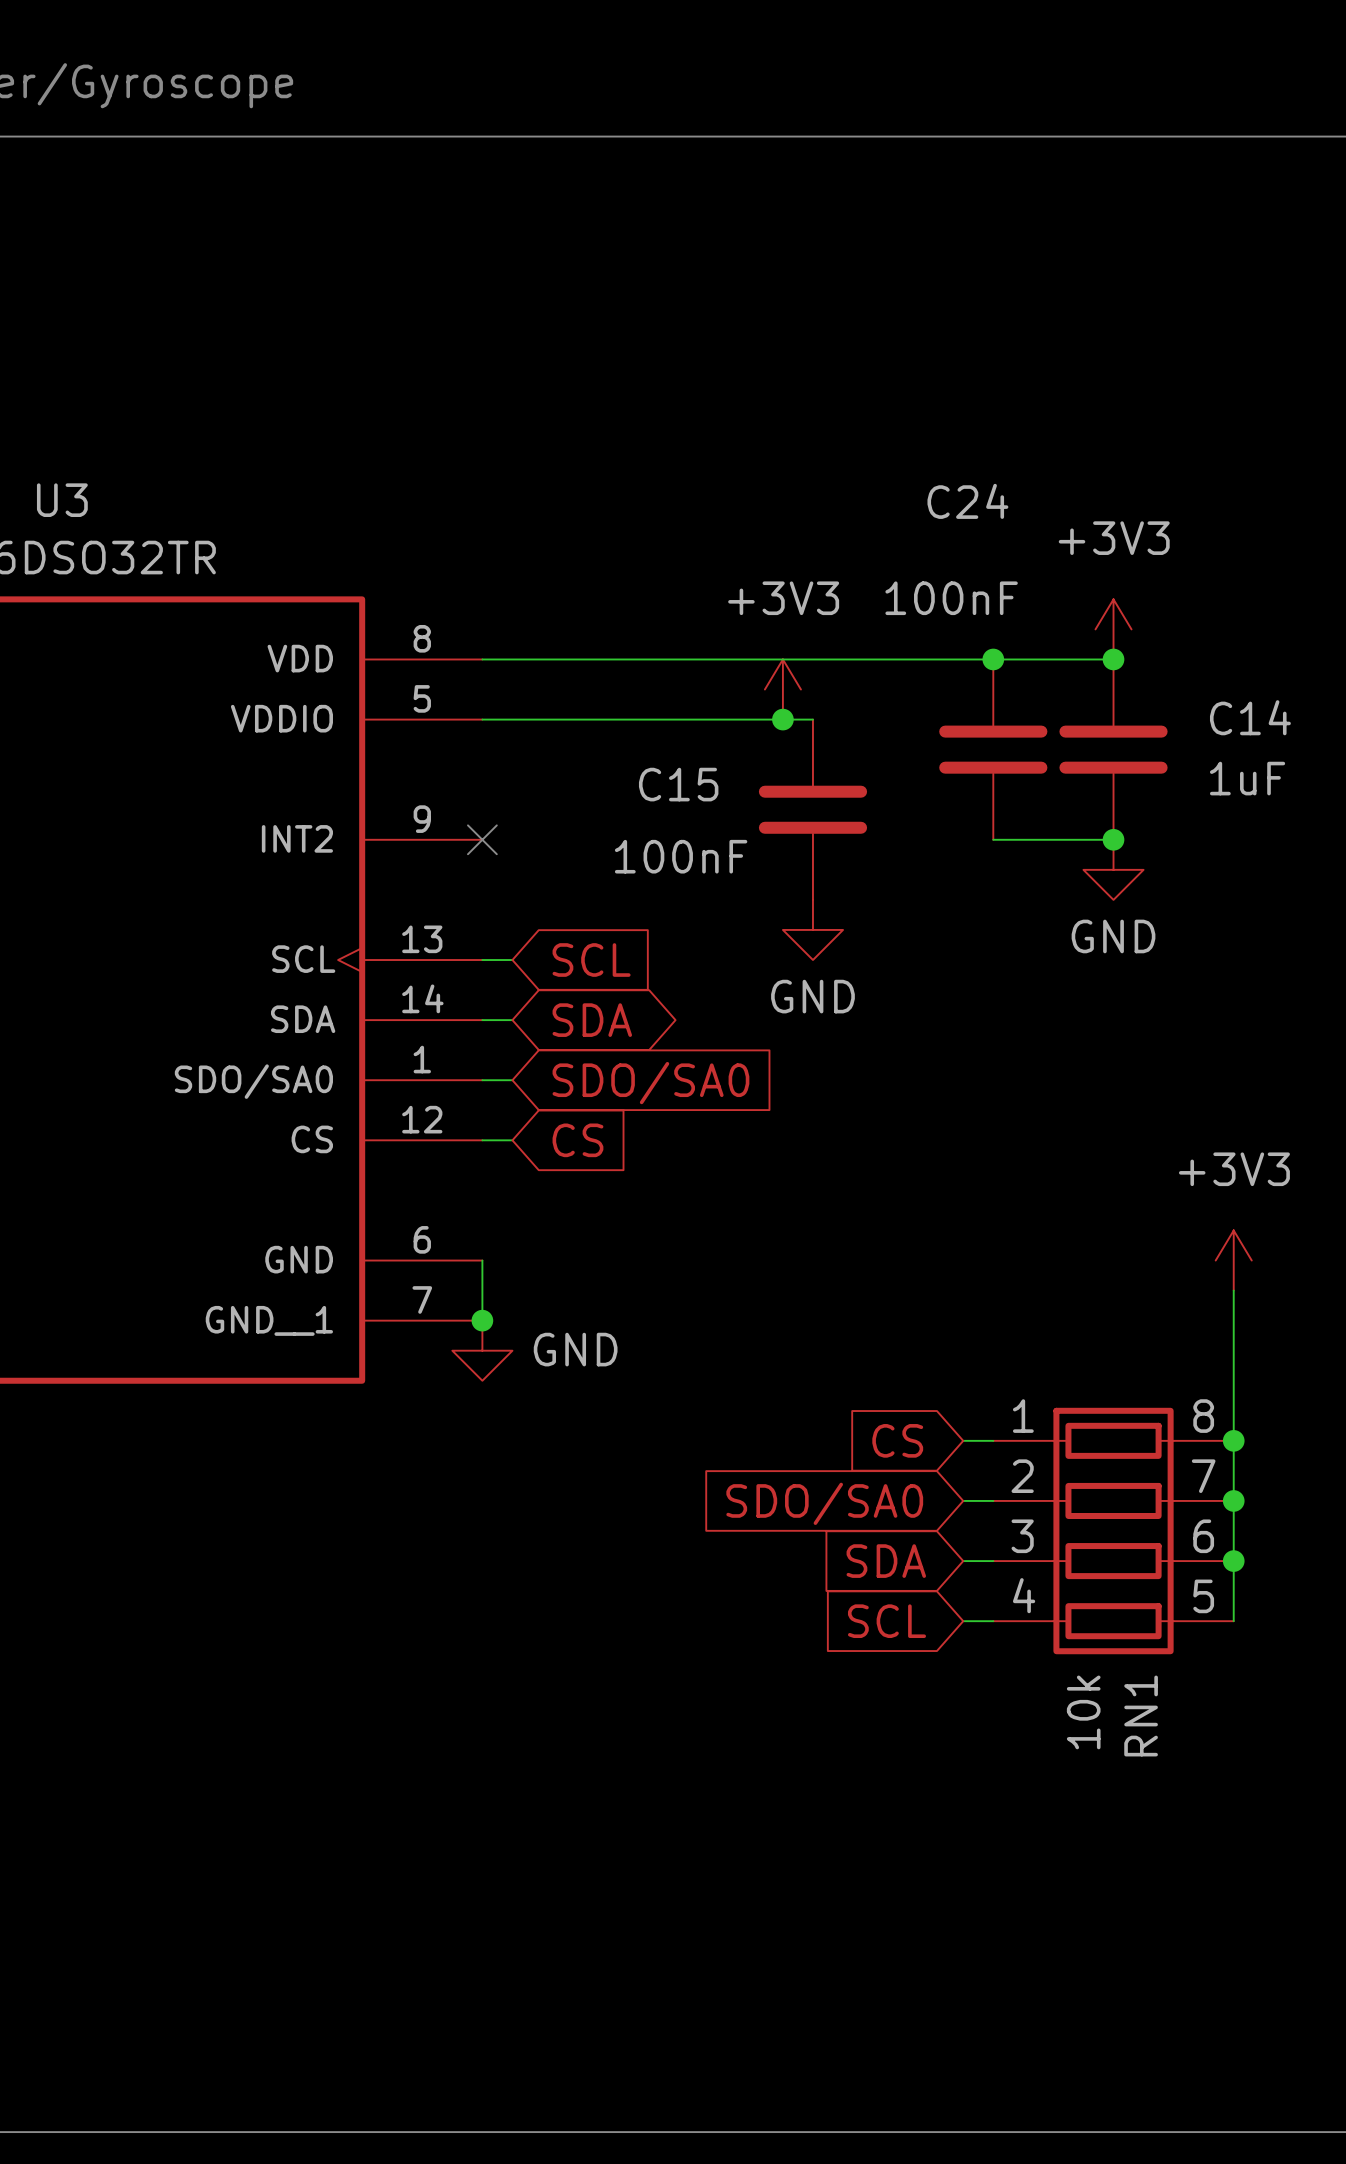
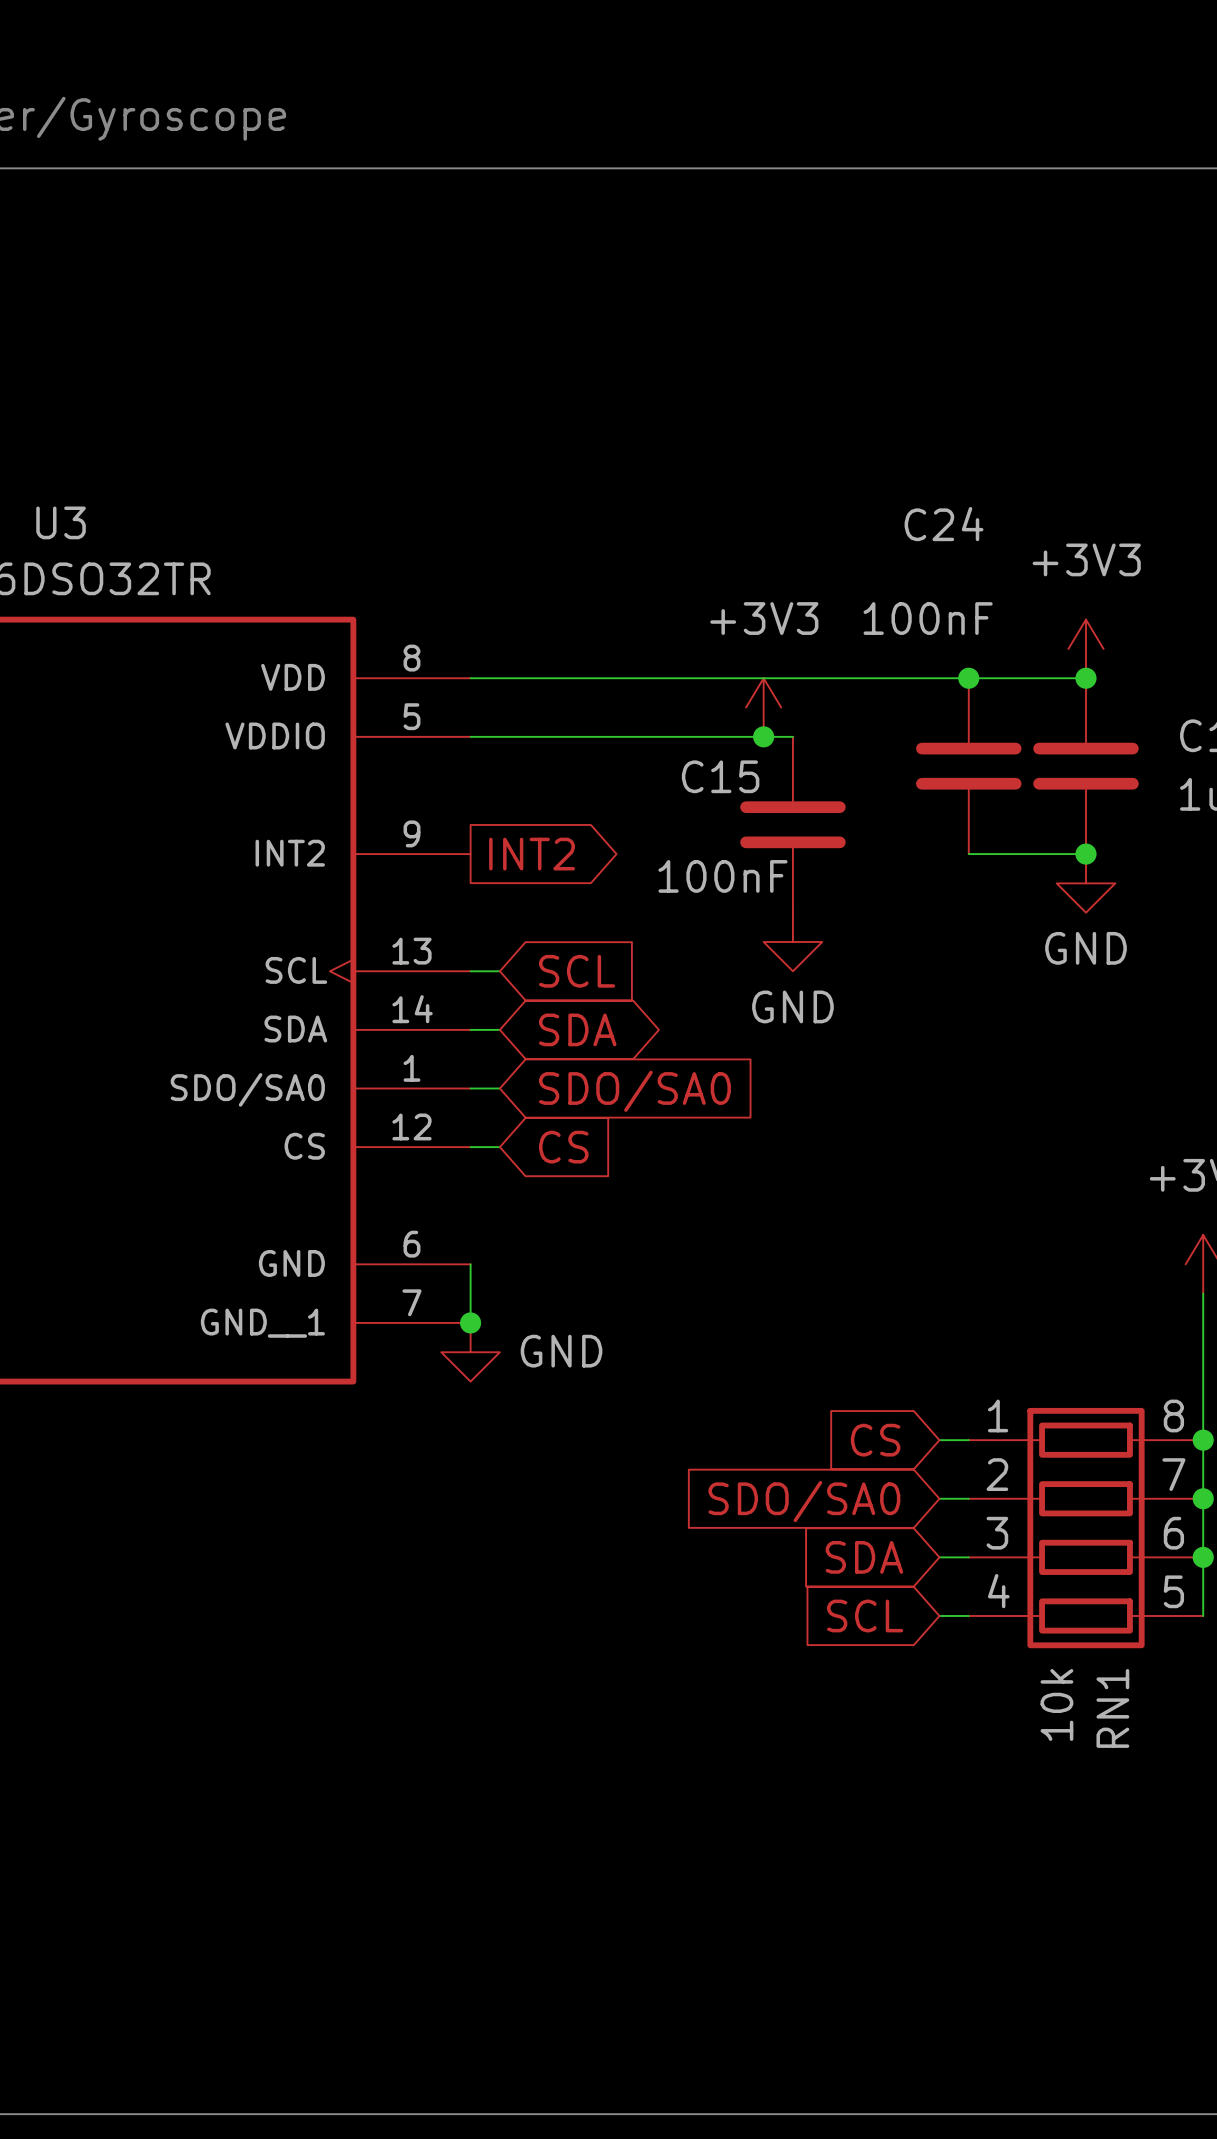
C15 name position: C15 (678, 784) -> C15 (720, 776)
no-connect mark: (482, 839) -> none
global label: none -> INT2 (532, 854)
C15 value position: 100nF (681, 856) -> 100nF (722, 876)

